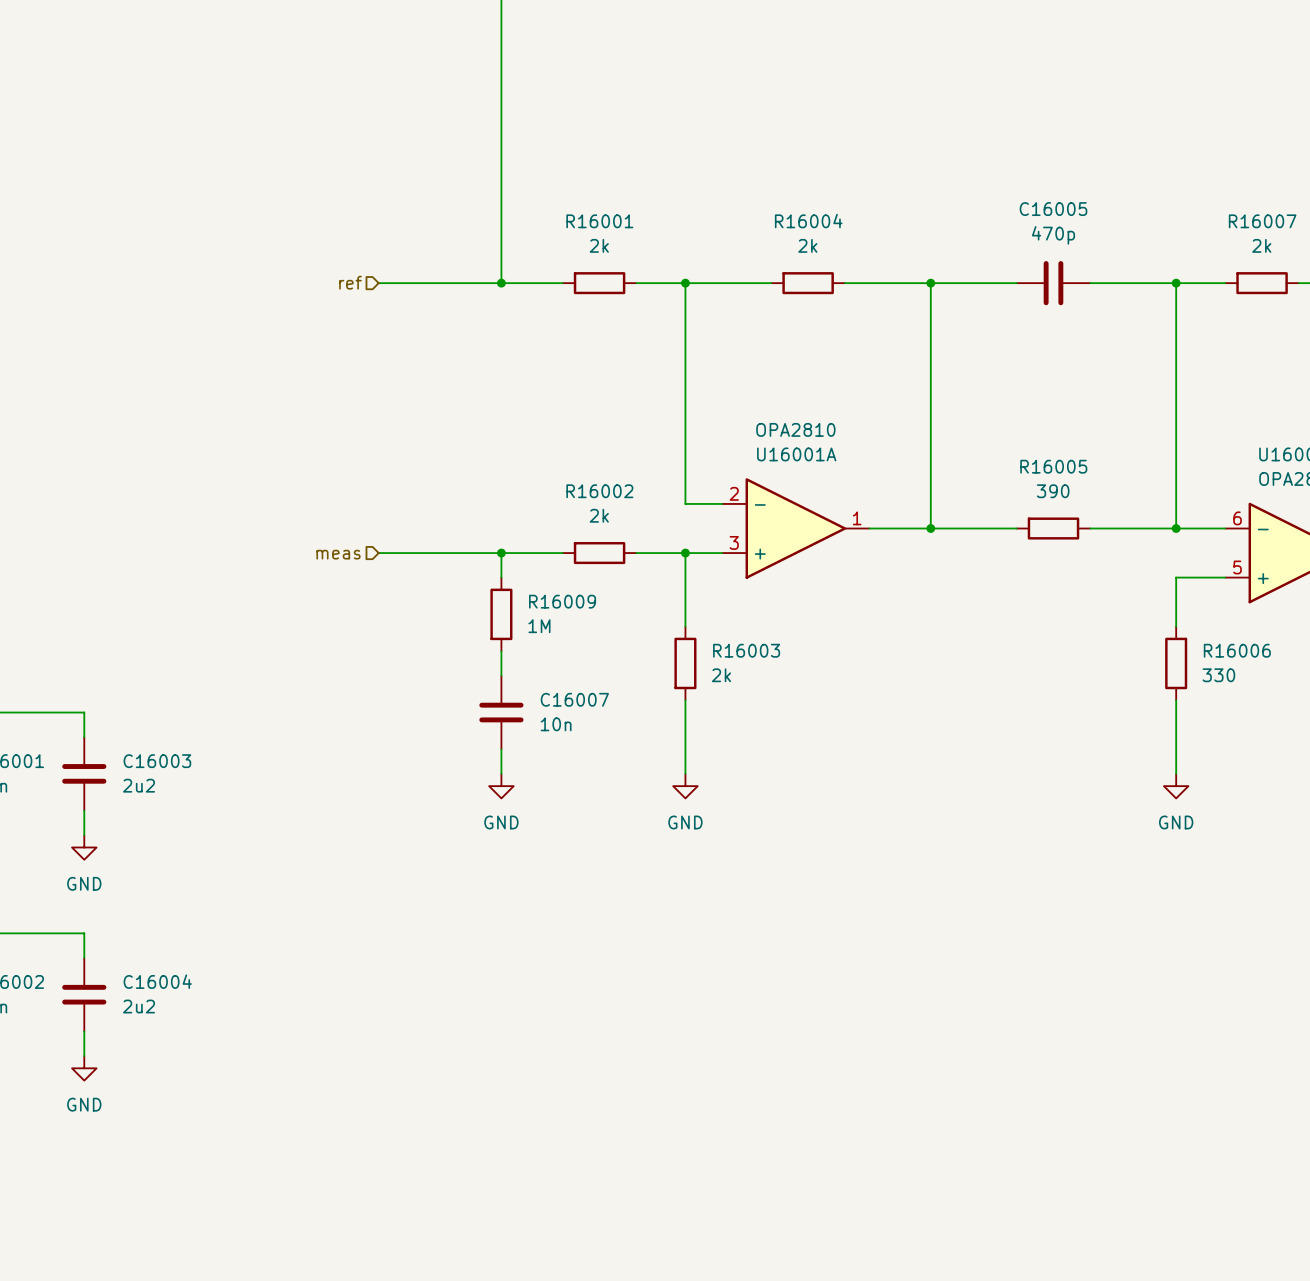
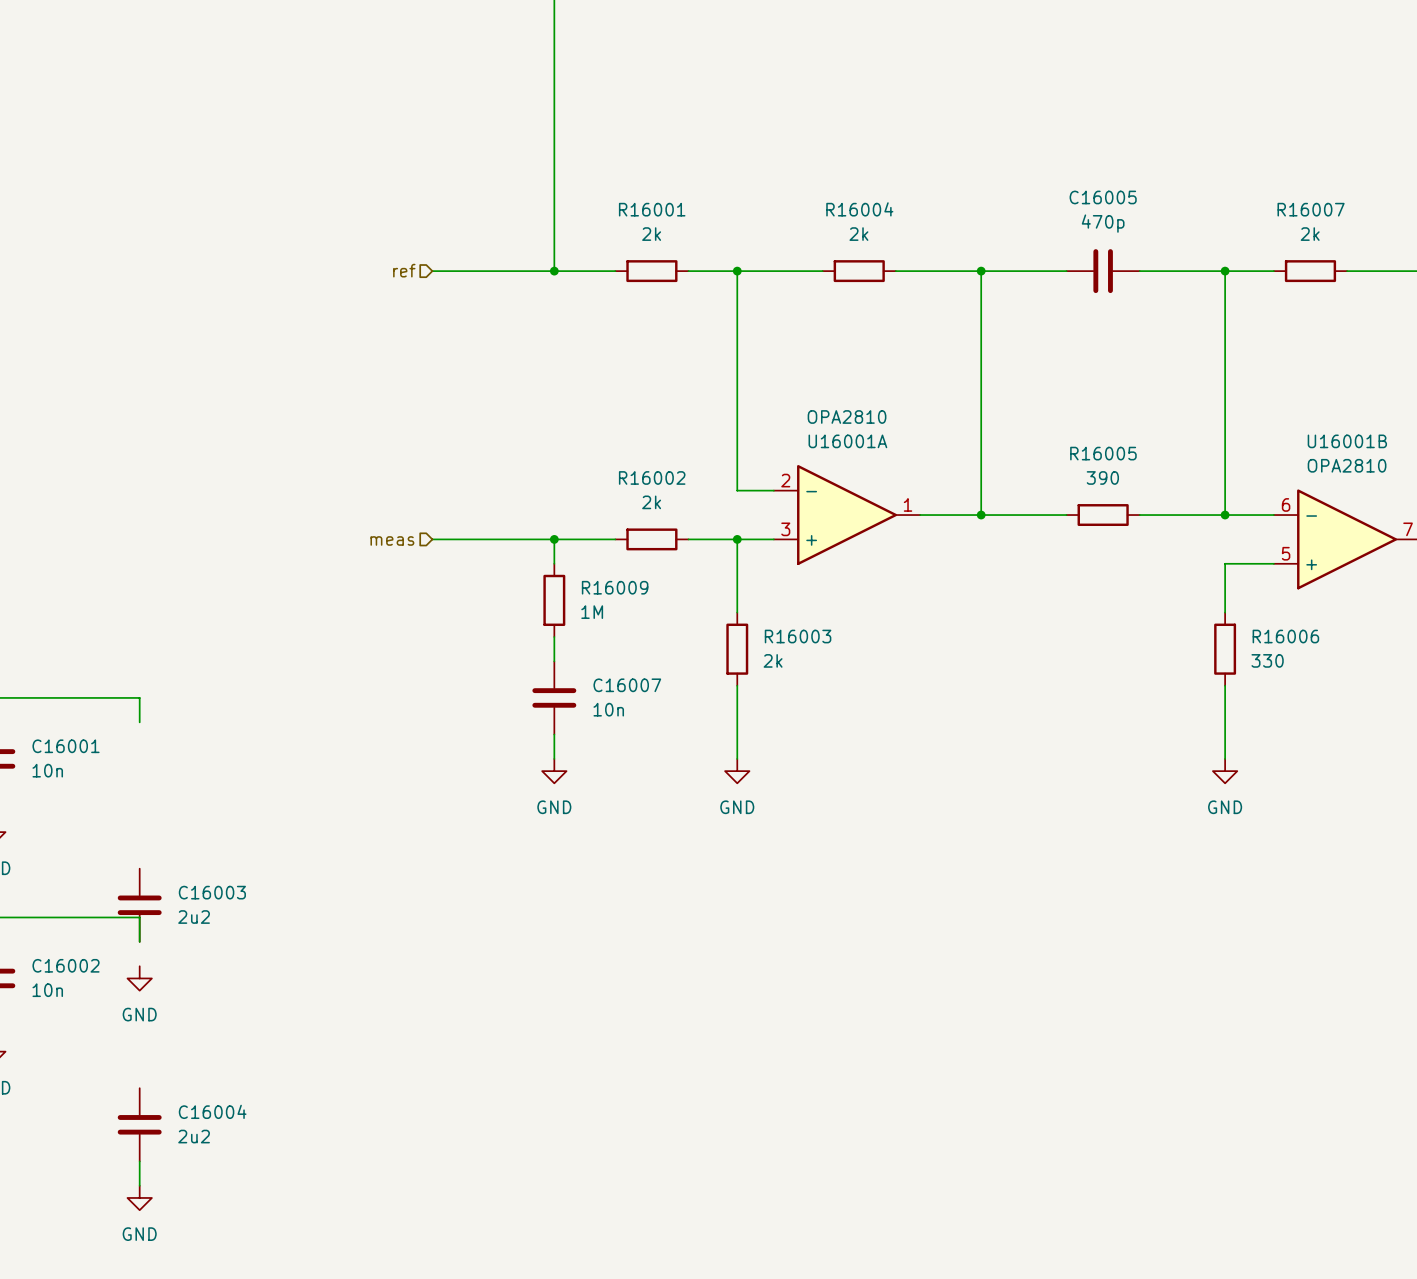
C16003 position: (84, 773) -> (139, 905)
wire: (84, 810) (84, 835) -> none
power symbol: GND (84, 847) -> none
C16004 position: (84, 994) -> (139, 1124)
power symbol: none -> GND (139, 978)
wire: (84, 1031) (84, 1056) -> (139, 1161) (139, 1185)
power symbol: GND (84, 1068) -> none
power symbol: none -> GND (139, 1197)

